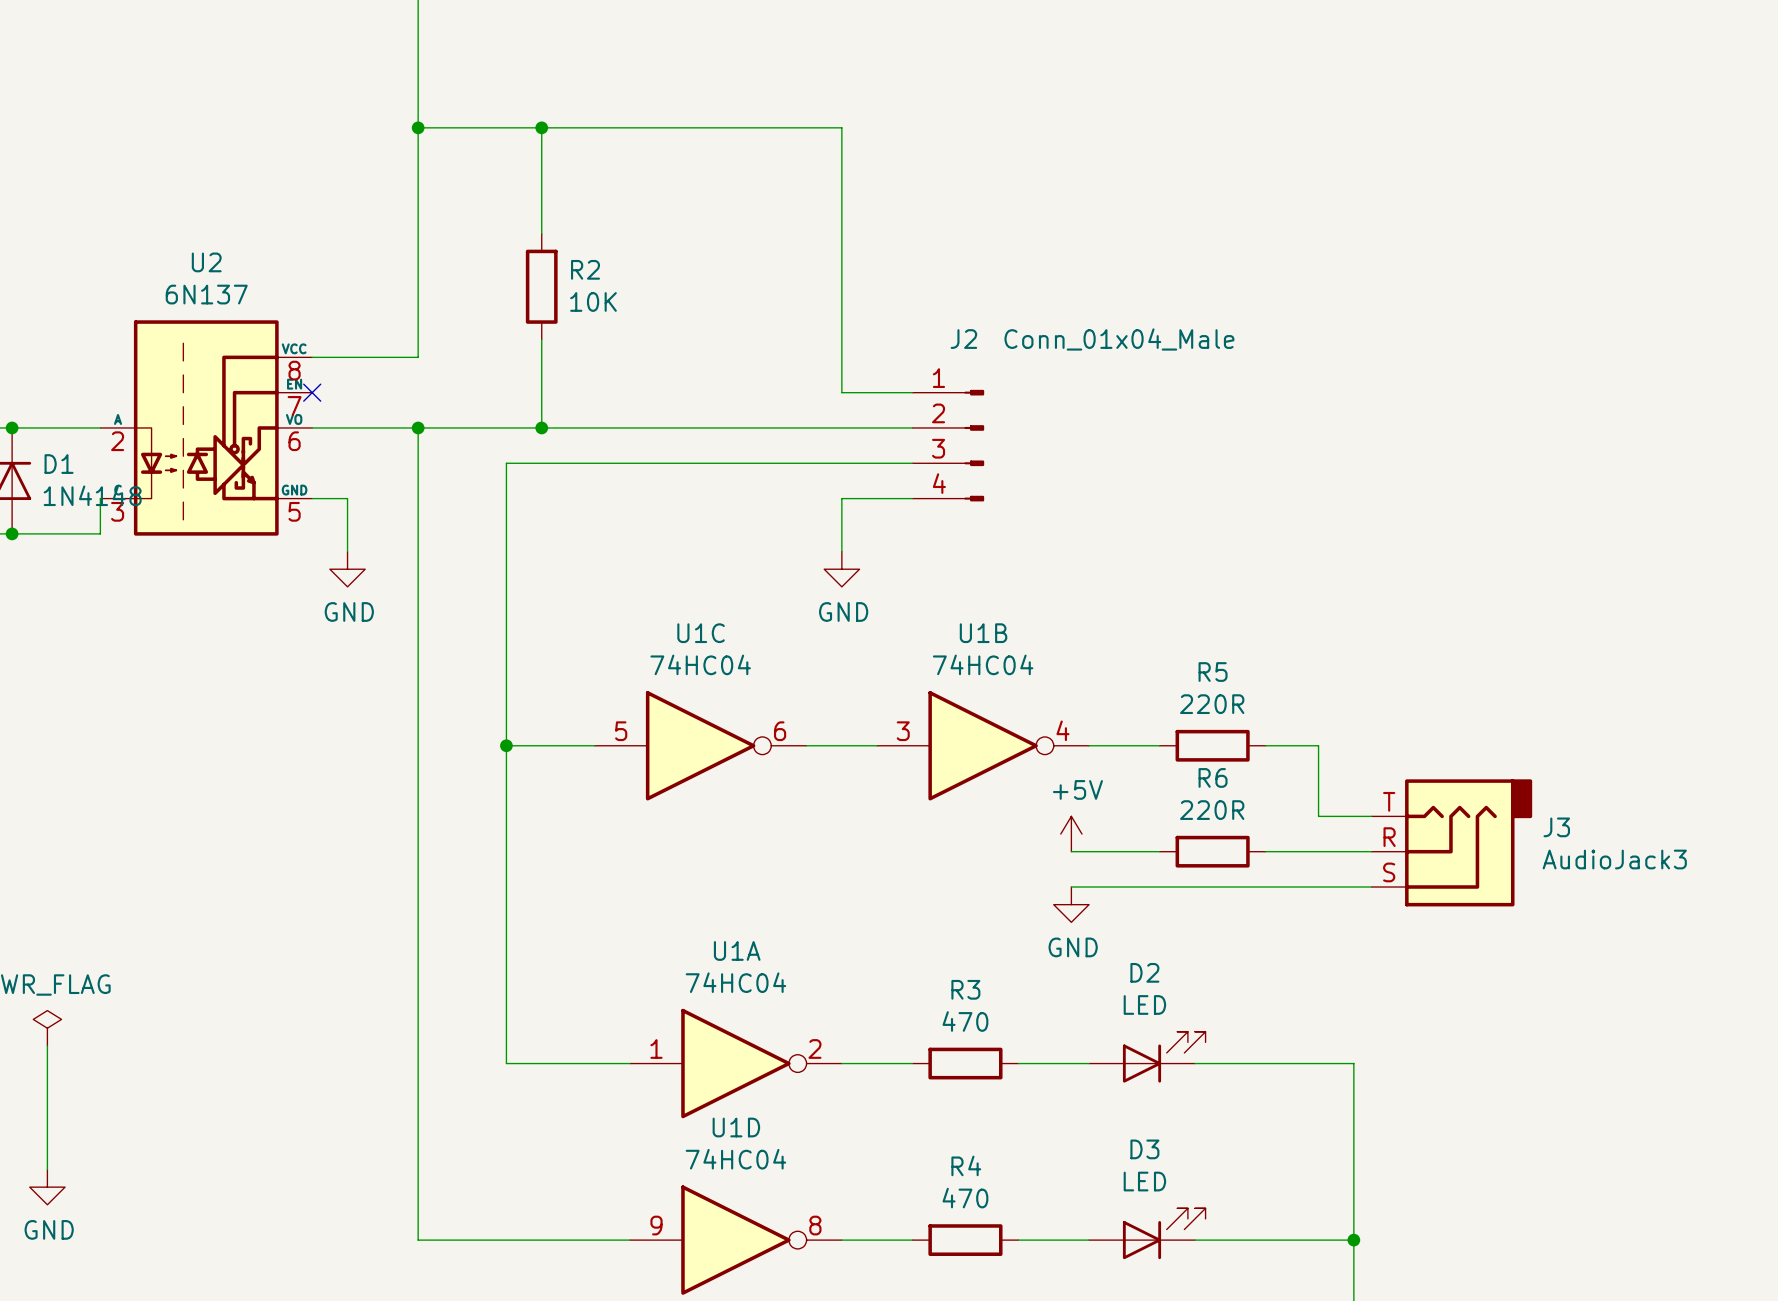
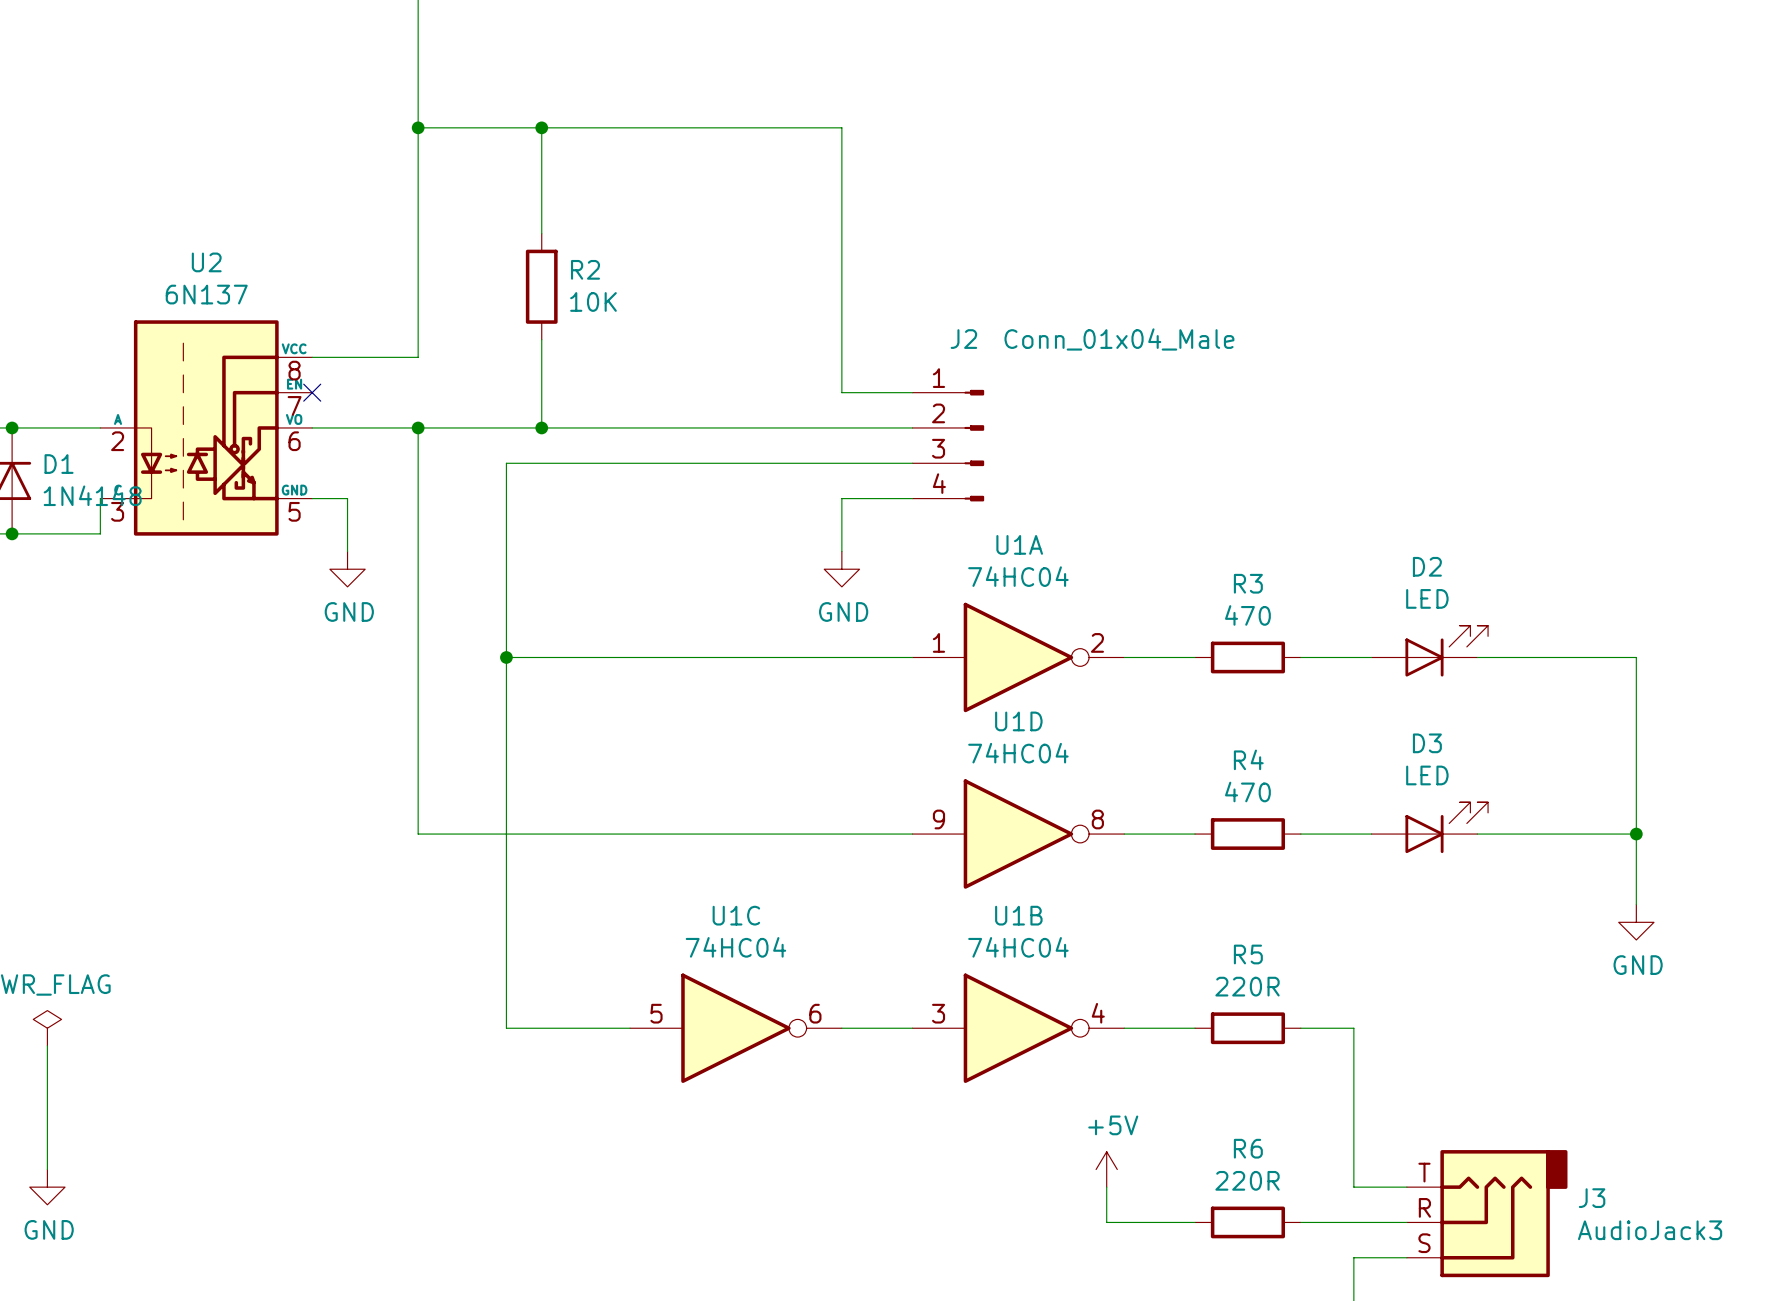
wire: none -> (506, 657) (912, 657)
junction: none -> (506, 657)
wire: none -> (1124, 657) (1194, 657)
wire: none -> (1300, 657) (1371, 657)
wire: none -> (1477, 657) (1636, 657) (1636, 904)
wire: (506, 745) (594, 745) -> none
junction: (506, 745) -> none
U1C position: (700, 745) -> (735, 1028)
wire: (806, 745) (877, 745) -> (841, 1028) (912, 1028)
U1B position: (983, 745) -> (1018, 1028)
wire: (1089, 745) (1159, 745) -> (1124, 1028) (1194, 1028)
R5 position: (1212, 745) -> (1247, 1028)
wire: (1265, 745) (1318, 745) (1318, 816) (1371, 816) -> none
wire: (418, 834) (418, 1240) (630, 1240) -> (418, 834) (912, 834)
power symbol position: +5V (1071, 834) -> +5V (1106, 1169)
wire: none -> (1300, 834) (1371, 834)
wire: none -> (1477, 834) (1636, 834)
junction: none -> (1636, 834)
J3 position: (1451, 842) -> (1487, 1213)
wire: (1071, 851) (1159, 851) -> none
R6 position: (1212, 851) -> (1247, 1222)
wire: (1265, 851) (1371, 851) -> none
wire: (1071, 887) (1371, 887) -> none
power symbol: GND (1071, 904) -> none
power symbol: none -> GND (1636, 922)
wire: (506, 1028) (506, 1063) (630, 1063) -> (506, 1028) (630, 1028)
D2 position: (1147, 1057) -> (1429, 651)
U1A position: (735, 1063) -> (1018, 657)
wire: (841, 1063) (912, 1063) -> none
R3 position: (965, 1063) -> (1247, 657)
wire: (1018, 1063) (1089, 1063) -> (1124, 834) (1194, 834)
wire: (1194, 1063) (1353, 1063) -> (1300, 1028) (1353, 1028) (1353, 1063)
wire: none -> (1106, 1187) (1106, 1222) (1194, 1222)
wire: (1353, 1187) (1353, 1257) -> (1353, 1187) (1406, 1187)
wire: none -> (1300, 1222) (1406, 1222)
D3 position: (1147, 1233) -> (1429, 827)
U1D position: (735, 1240) -> (1018, 834)
wire: (841, 1240) (912, 1240) -> none
R4 position: (965, 1240) -> (1247, 834)
wire: (1018, 1240) (1089, 1240) -> none
wire: (1194, 1240) (1353, 1240) -> none
junction: (1353, 1240) -> none
wire: none -> (1353, 1257) (1406, 1257)

